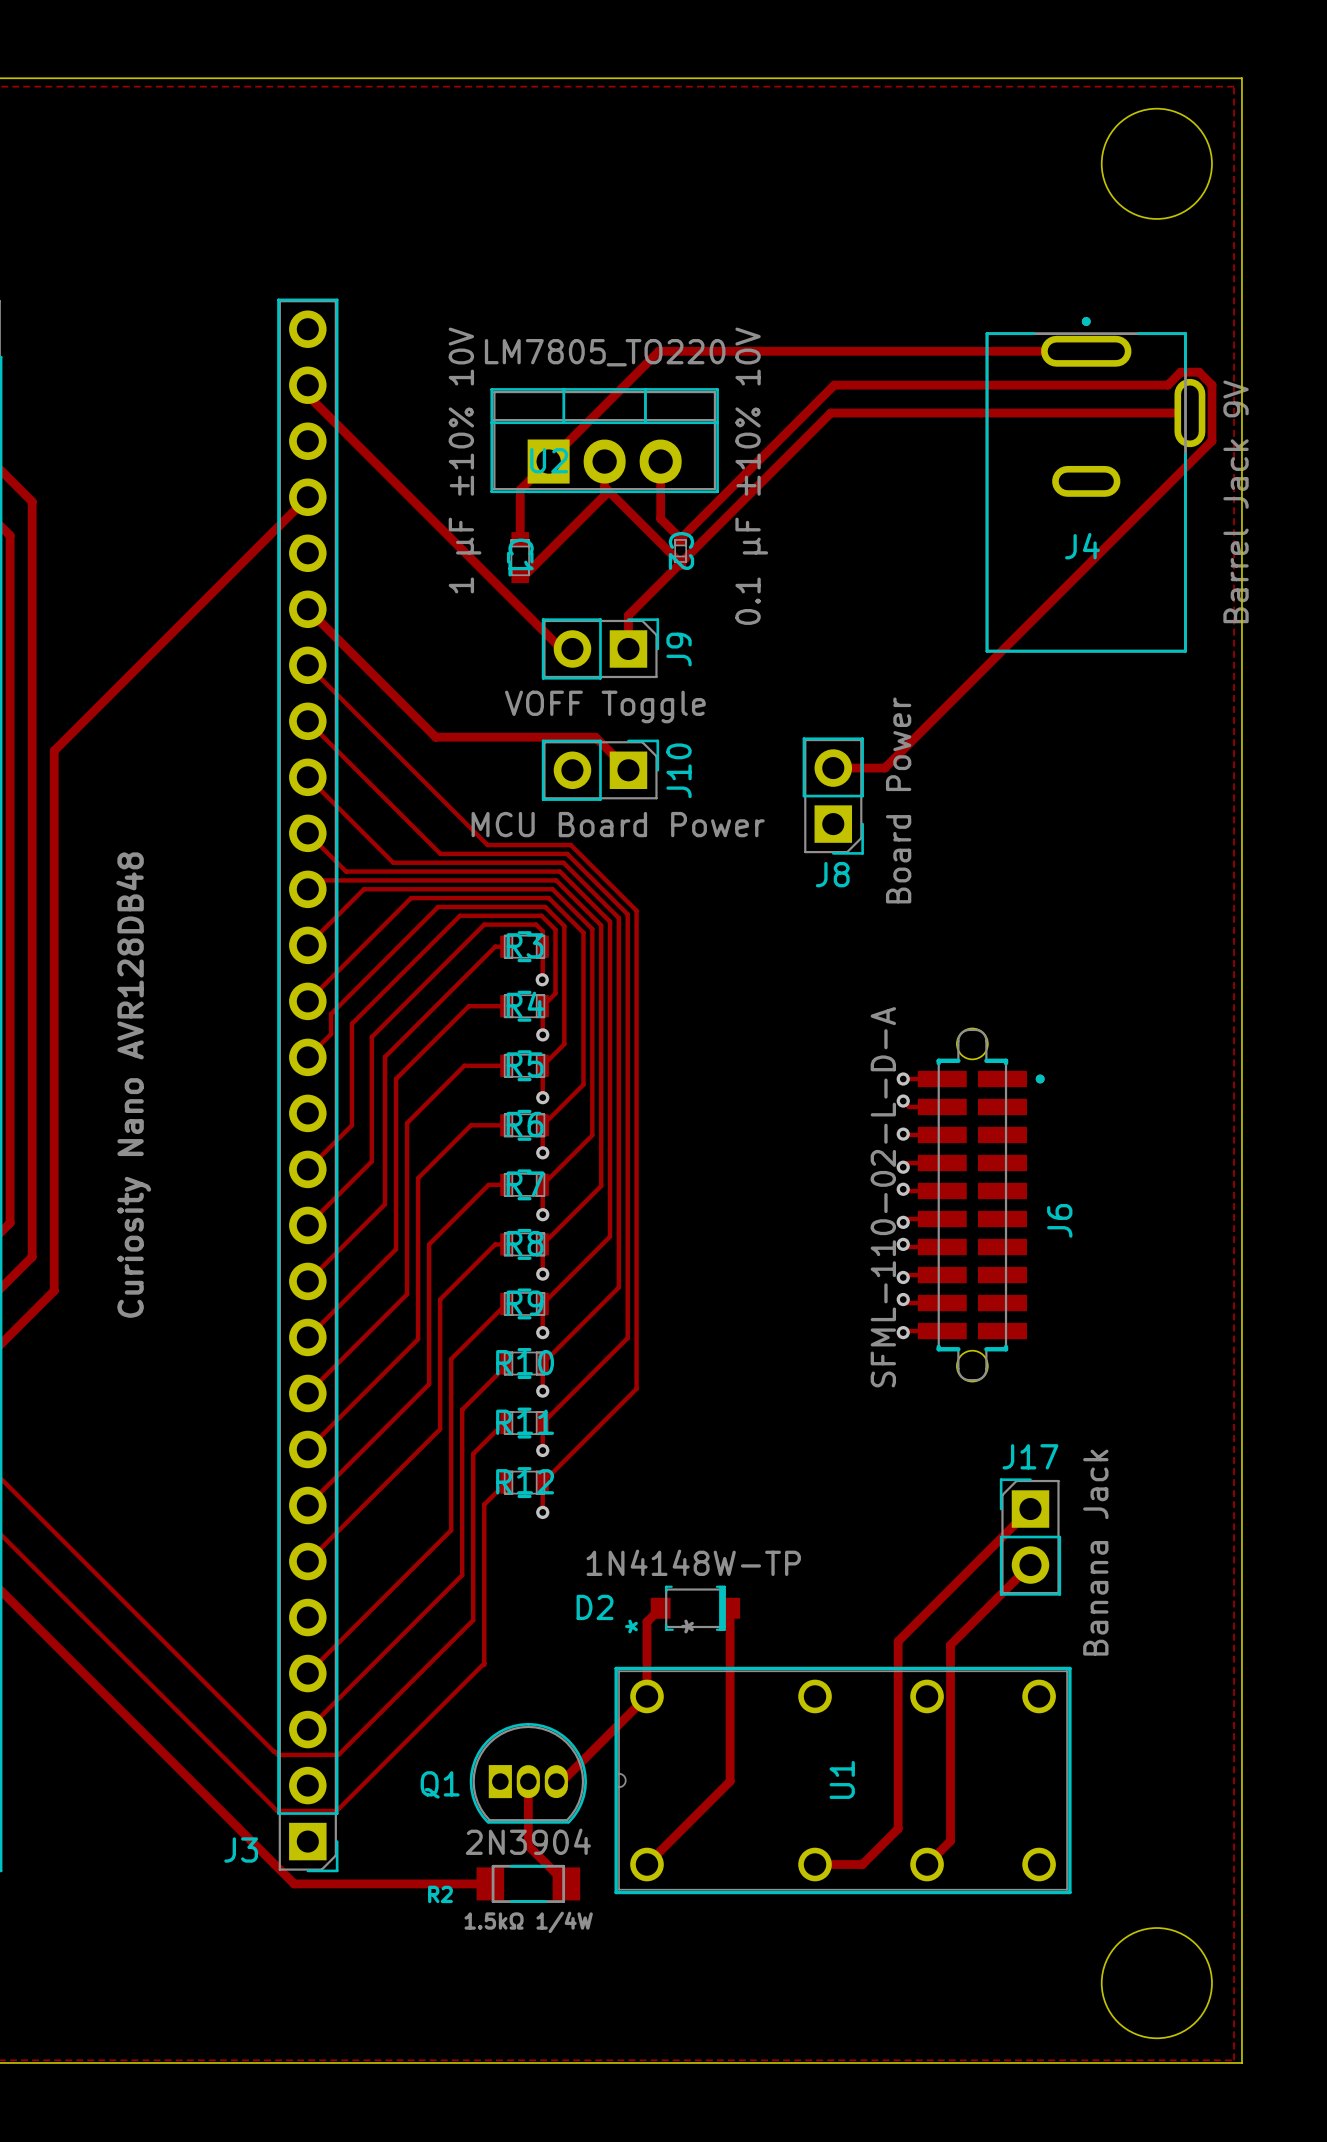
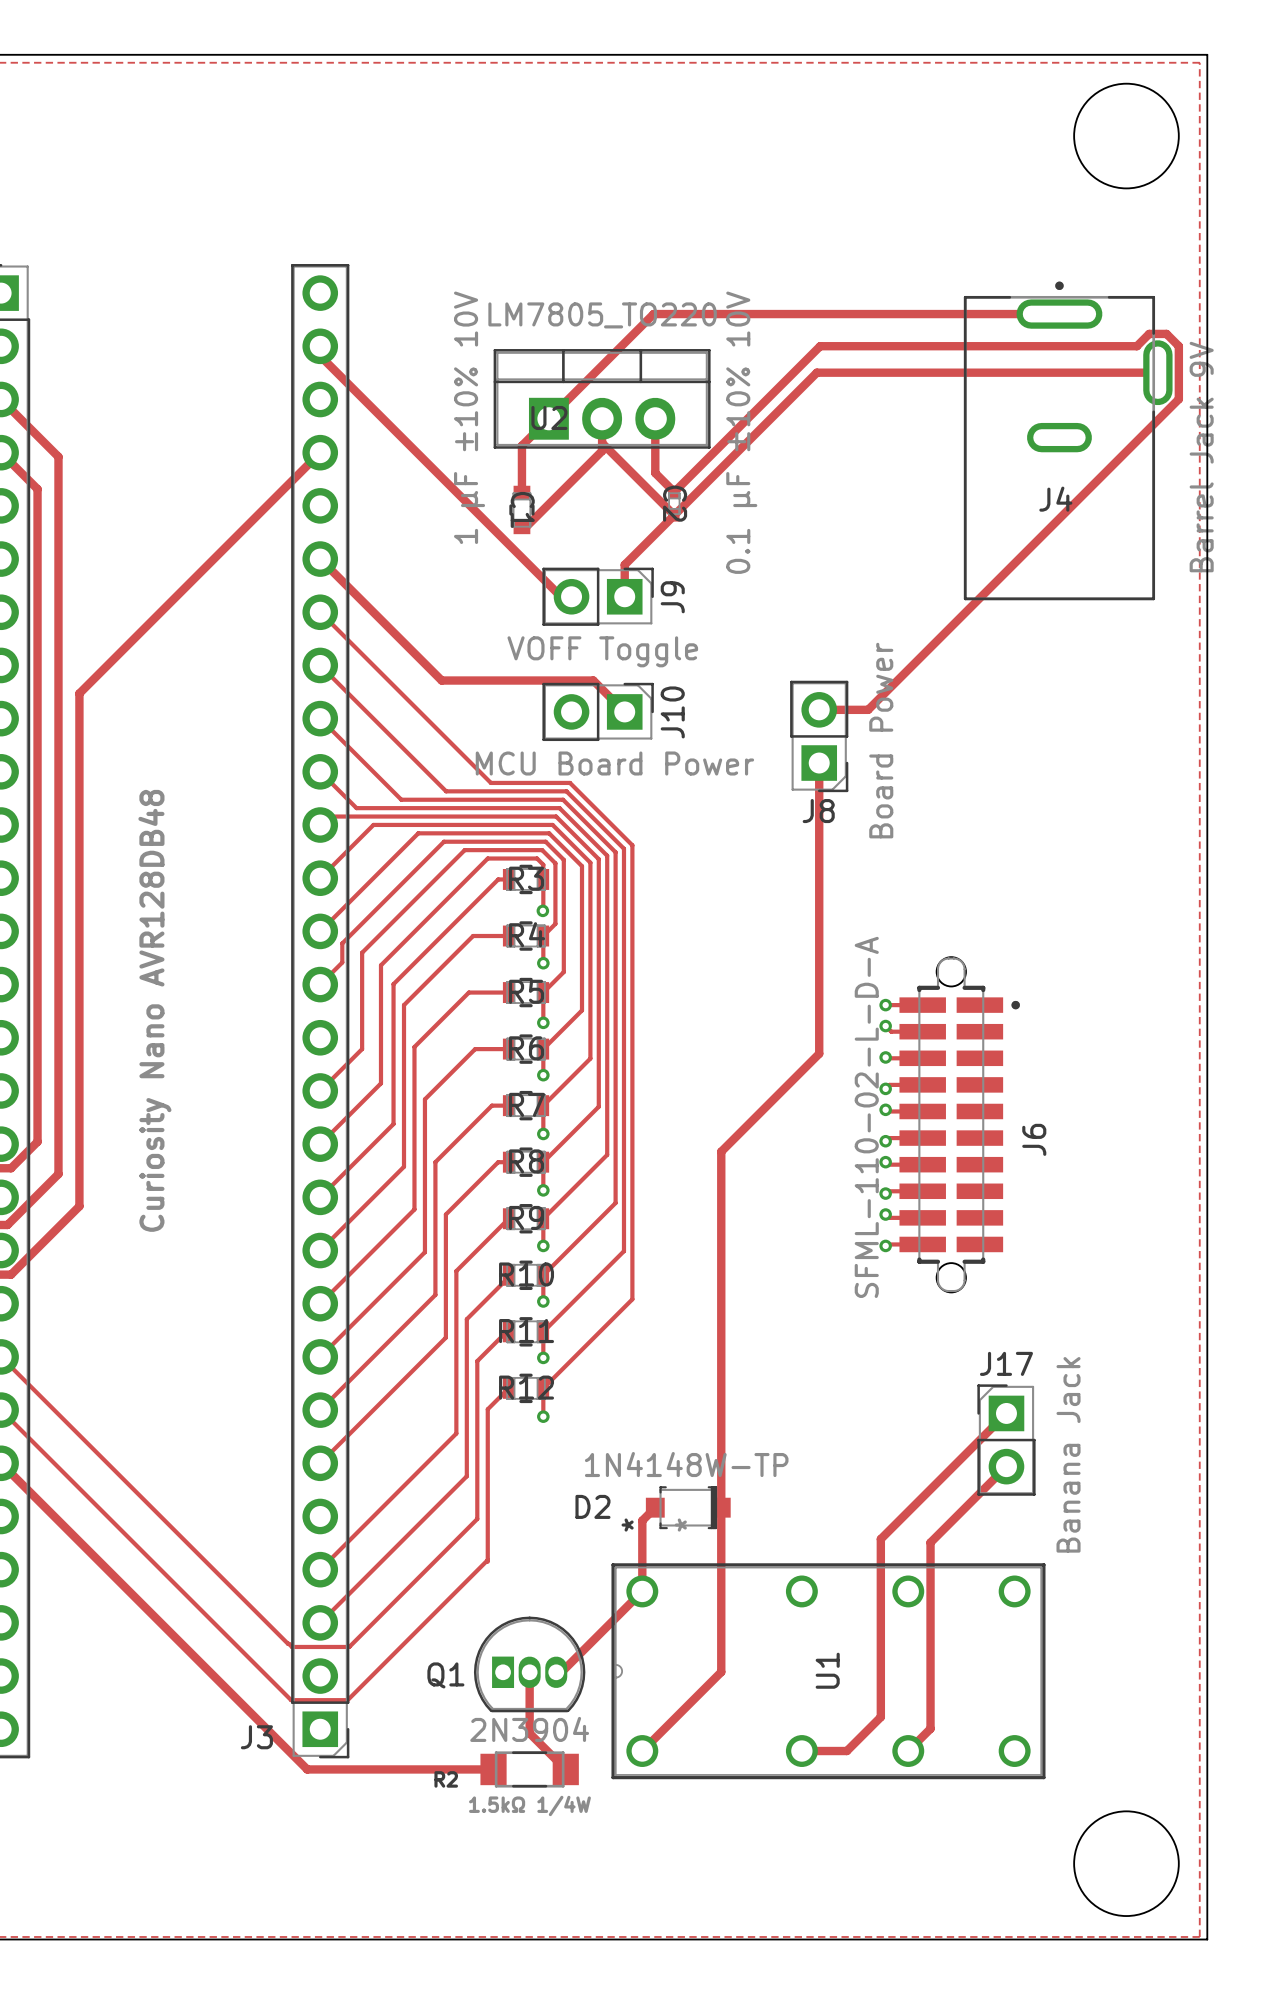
track: none -> (819, 763) (819, 1053) (721, 1151) (721, 1507)

